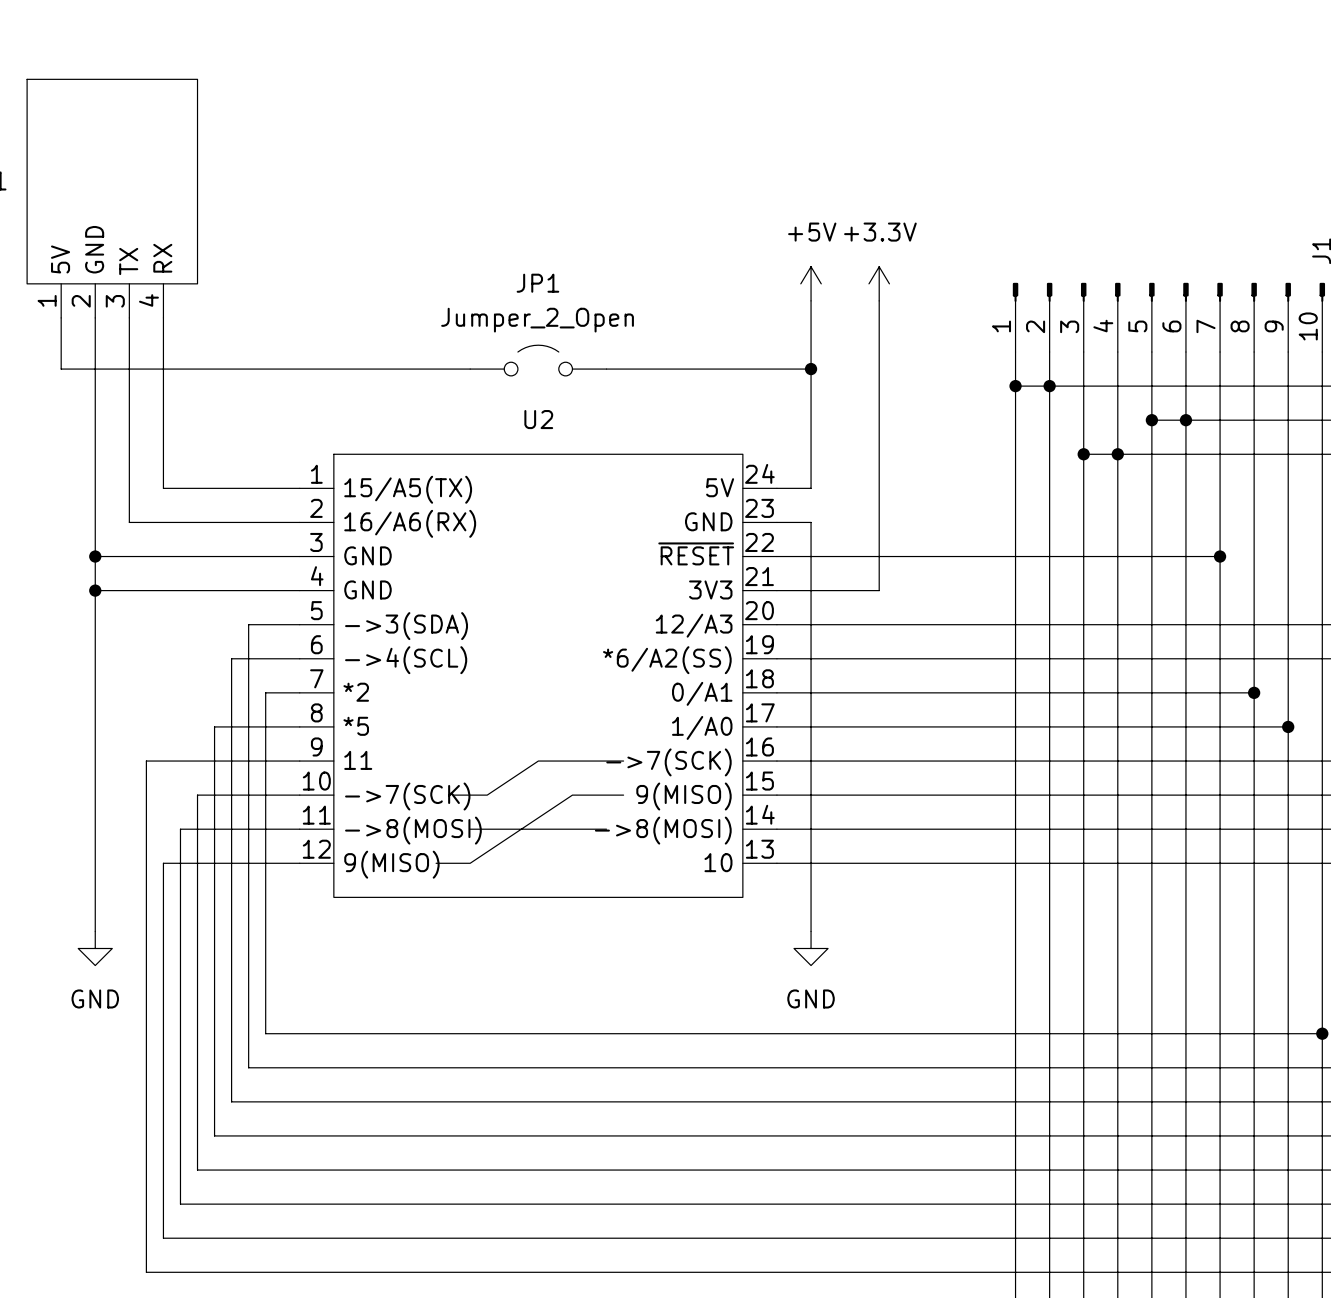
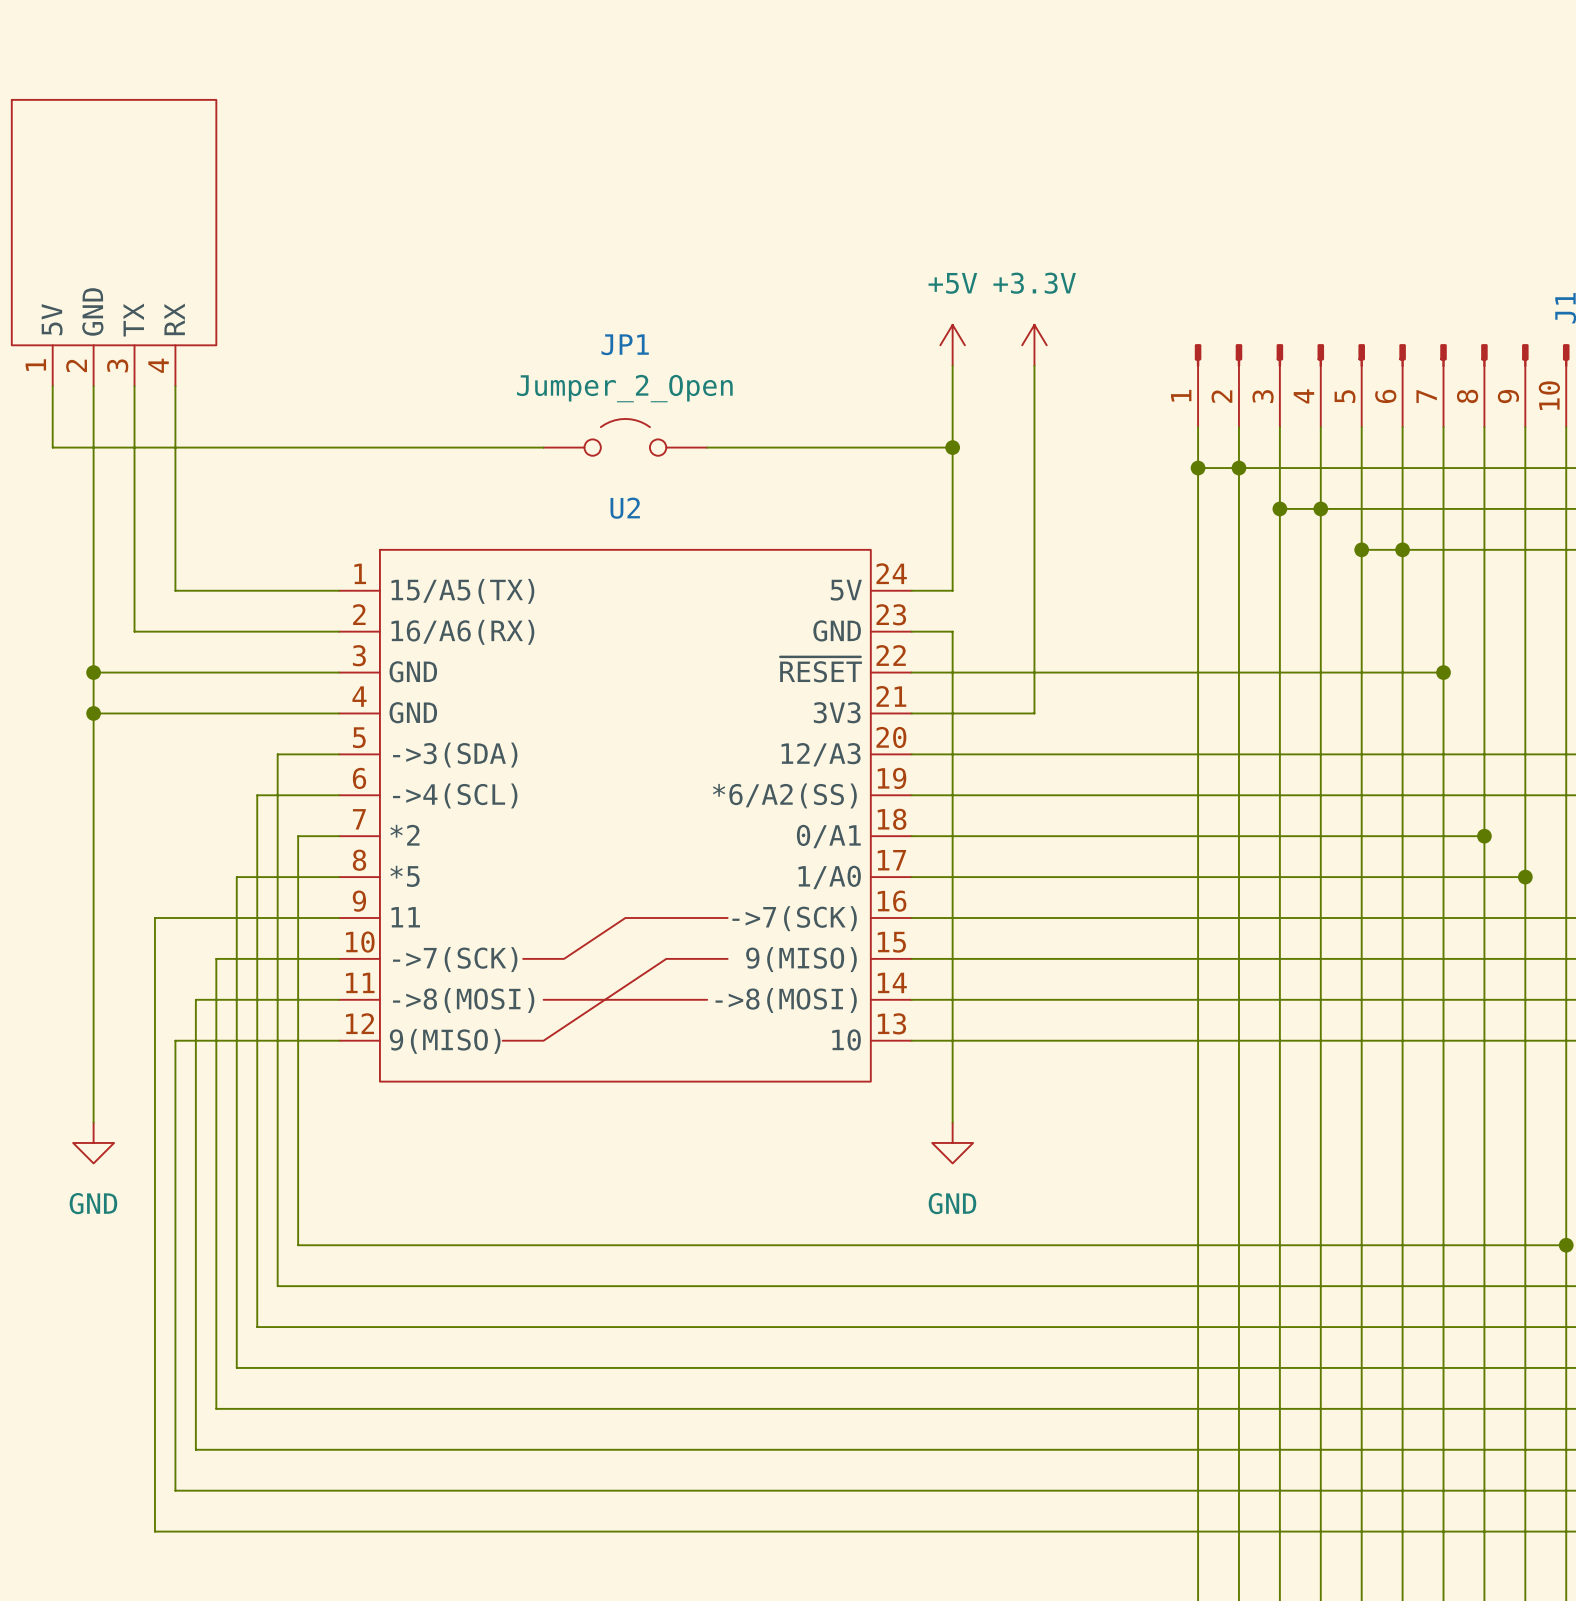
junction: none -> (1279, 508)
junction: none -> (1320, 508)
junction: (1151, 420) -> none
junction: (1185, 420) -> none
wire: (1083, 454) (1151, 454) -> (1279, 508) (1361, 508)
junction: (1083, 454) -> none
junction: (1117, 454) -> none
junction: none -> (1361, 549)
junction: none -> (1402, 549)

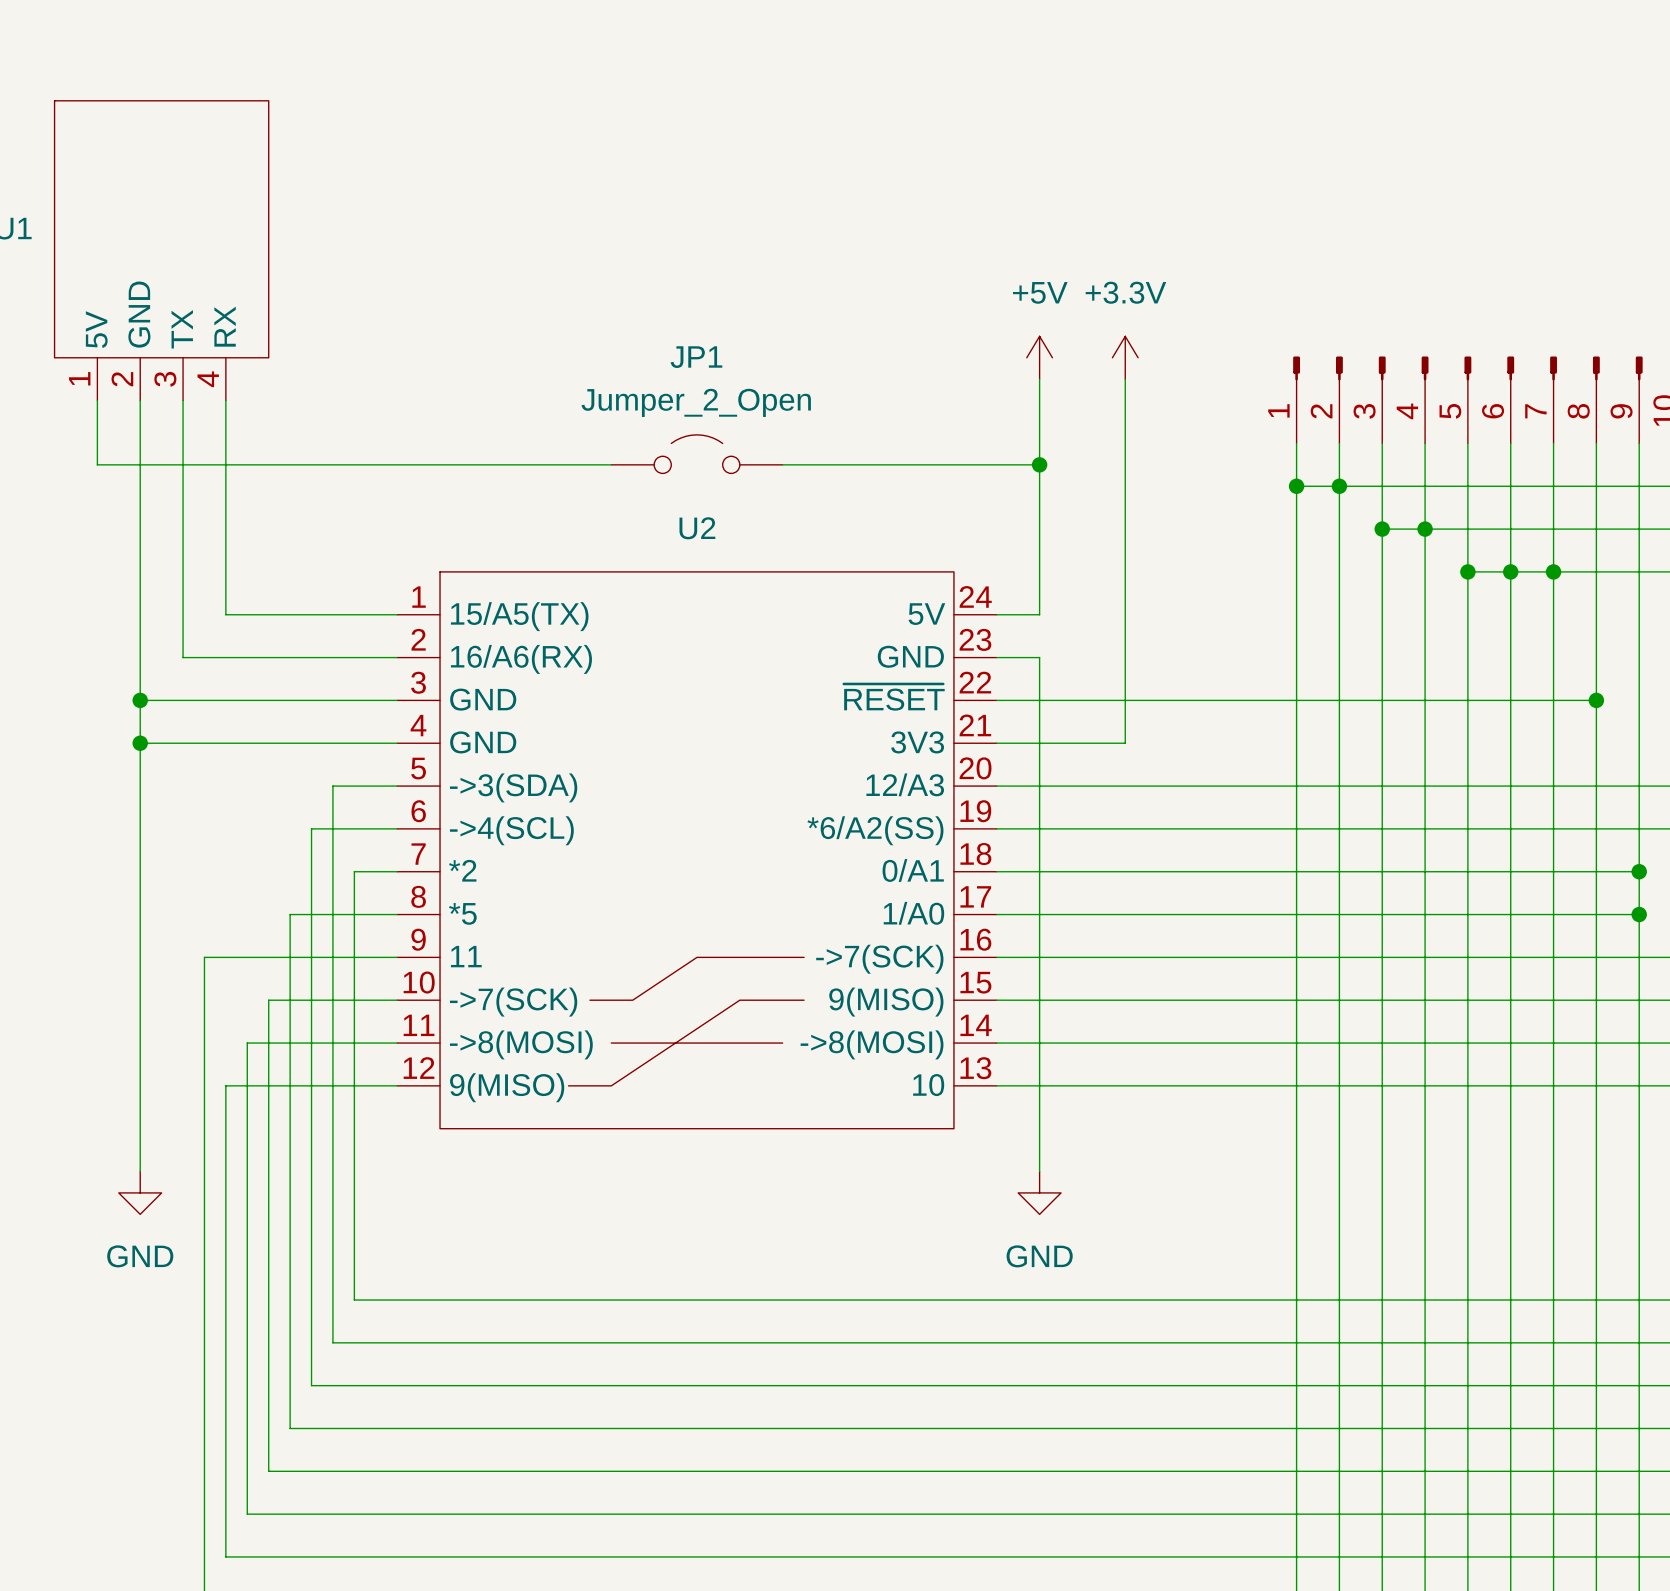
junction: none -> (1553, 571)
wire: none -> (1553, 700) (1596, 700)
junction position: (1443, 672) -> (1596, 700)
wire: none -> (1596, 871) (1639, 871)
junction position: (1484, 836) -> (1639, 871)

